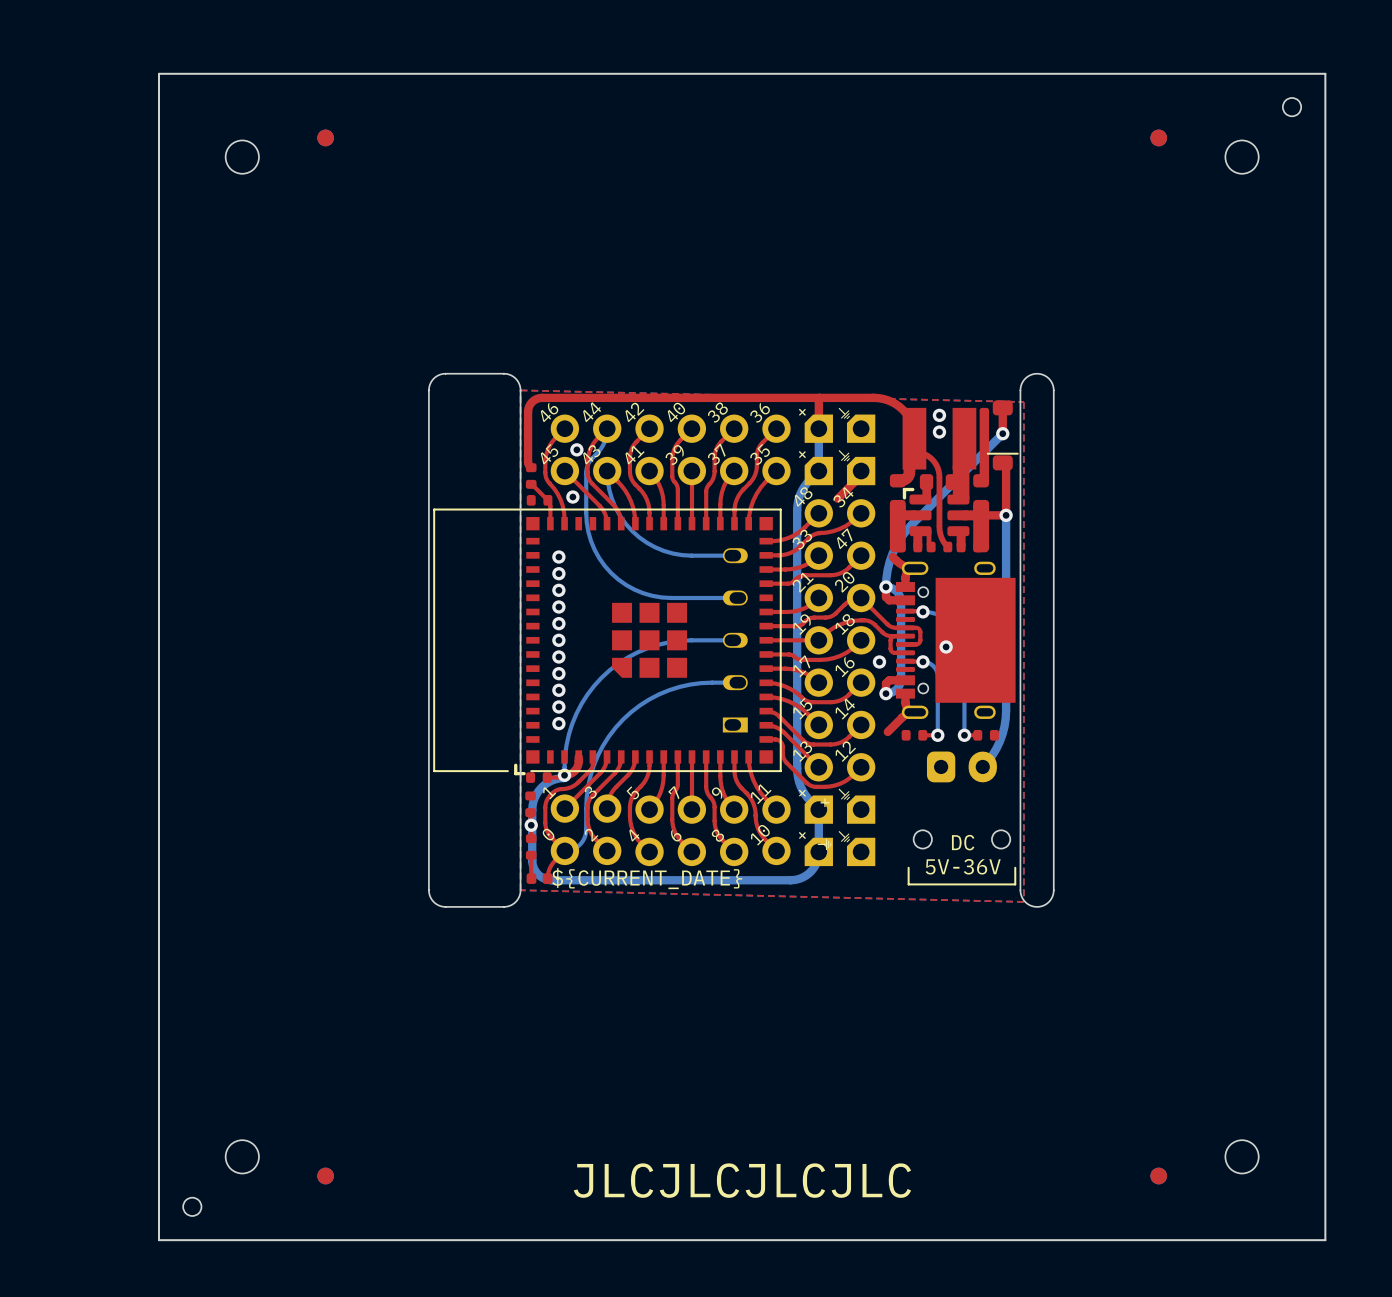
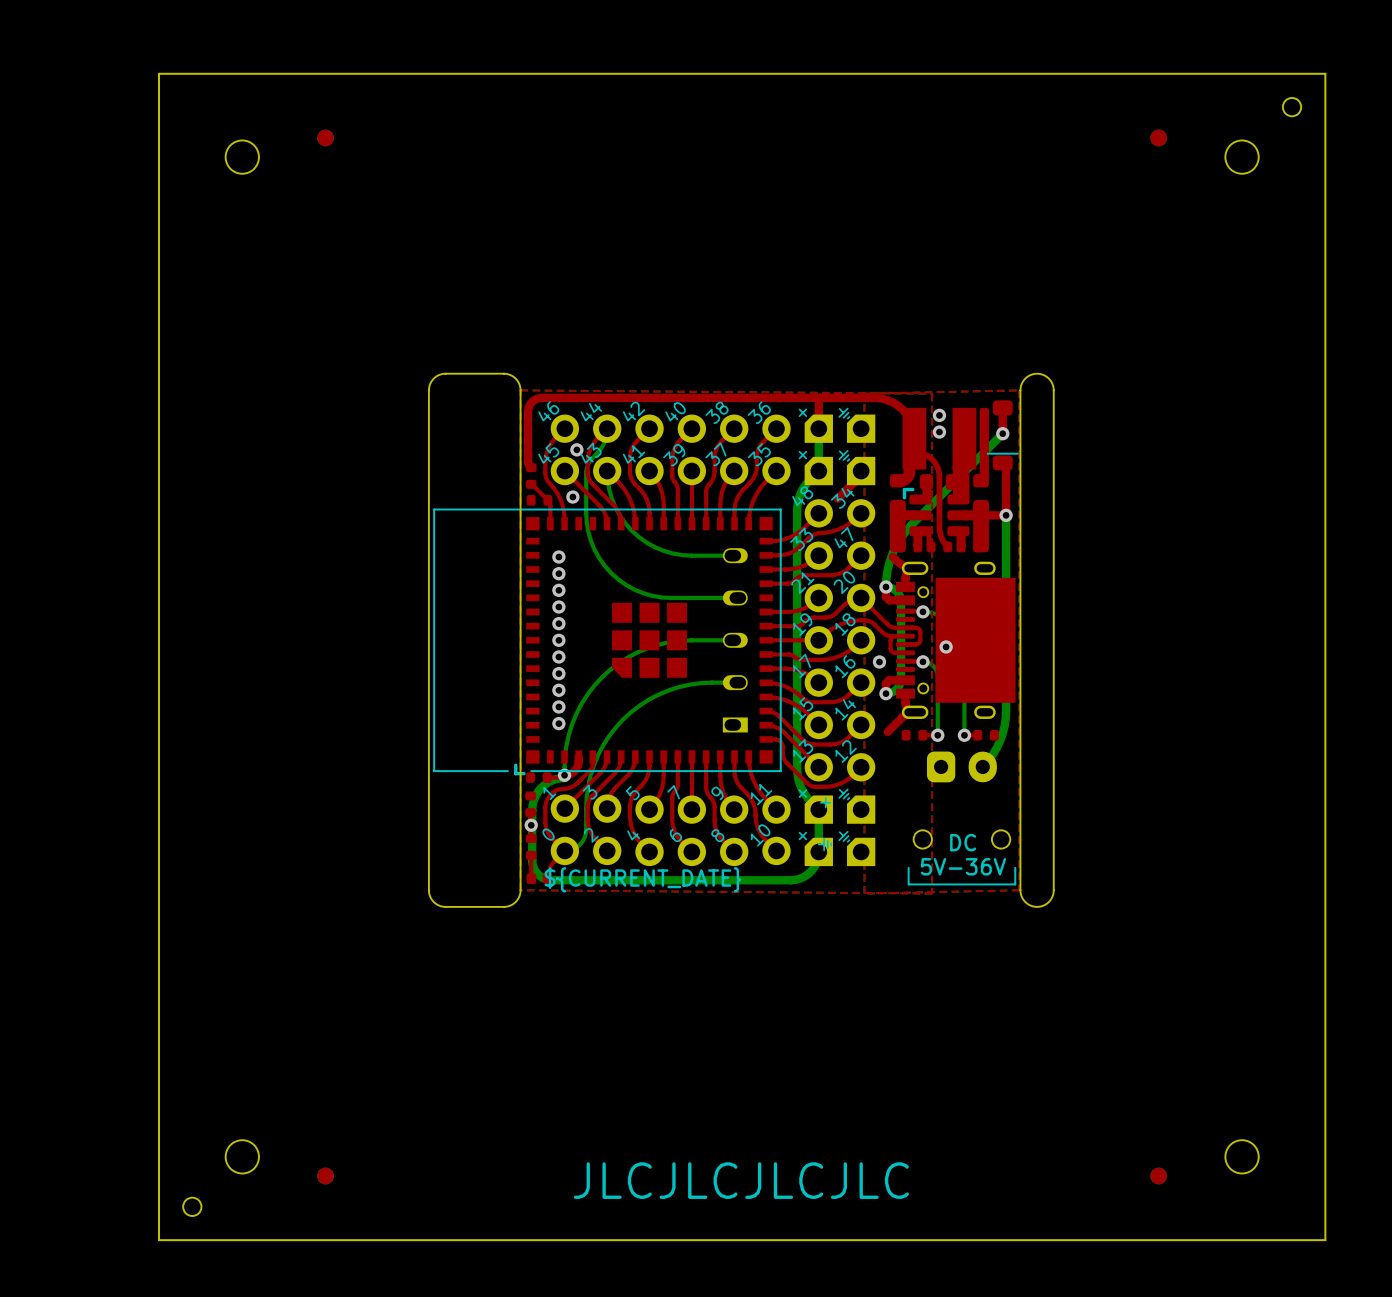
top zone outline: (520, 390) (1023, 402) (1023, 901) (520, 890) -> (520, 390) (932, 393) (932, 893) (520, 890)
top zone outline: none -> (1019, 390) (1019, 890) (864, 893) (864, 393) (1019, 390)

